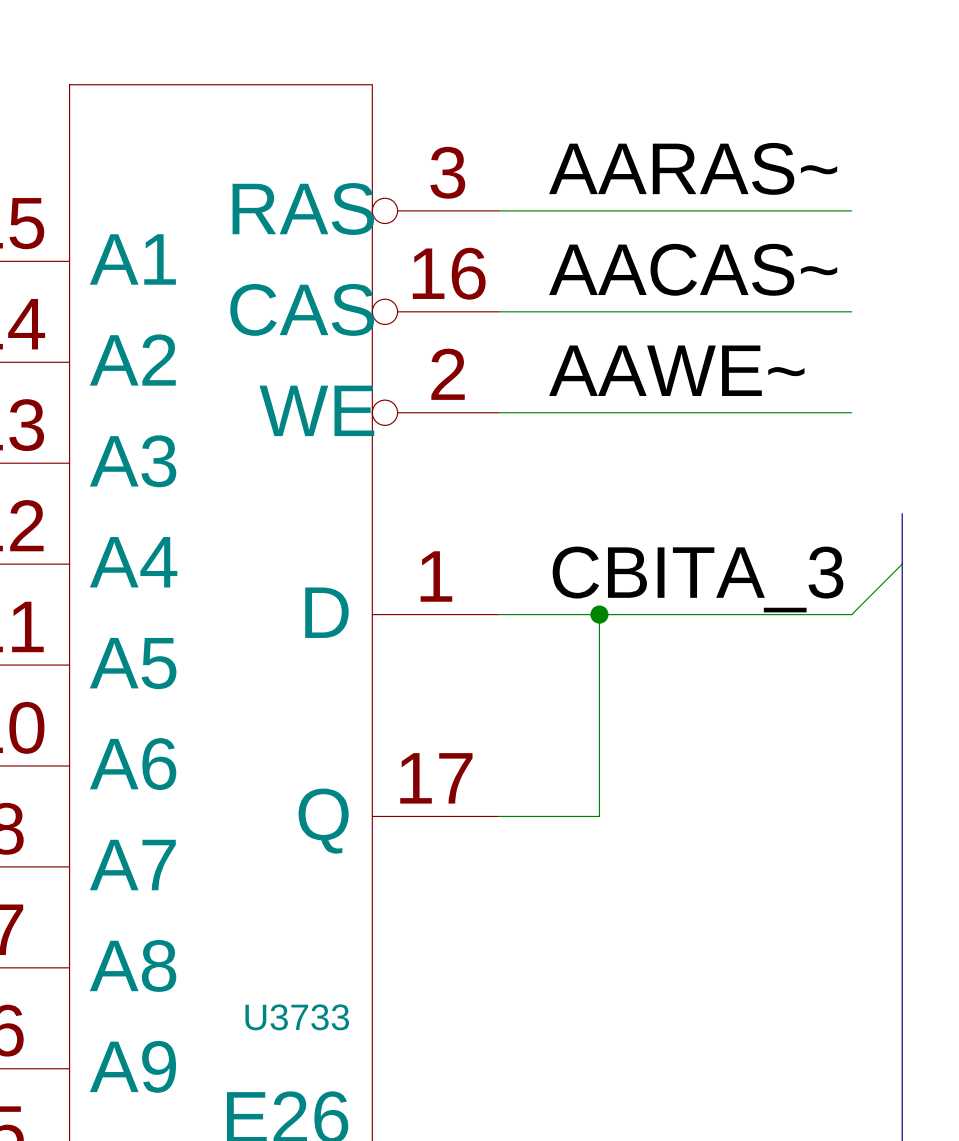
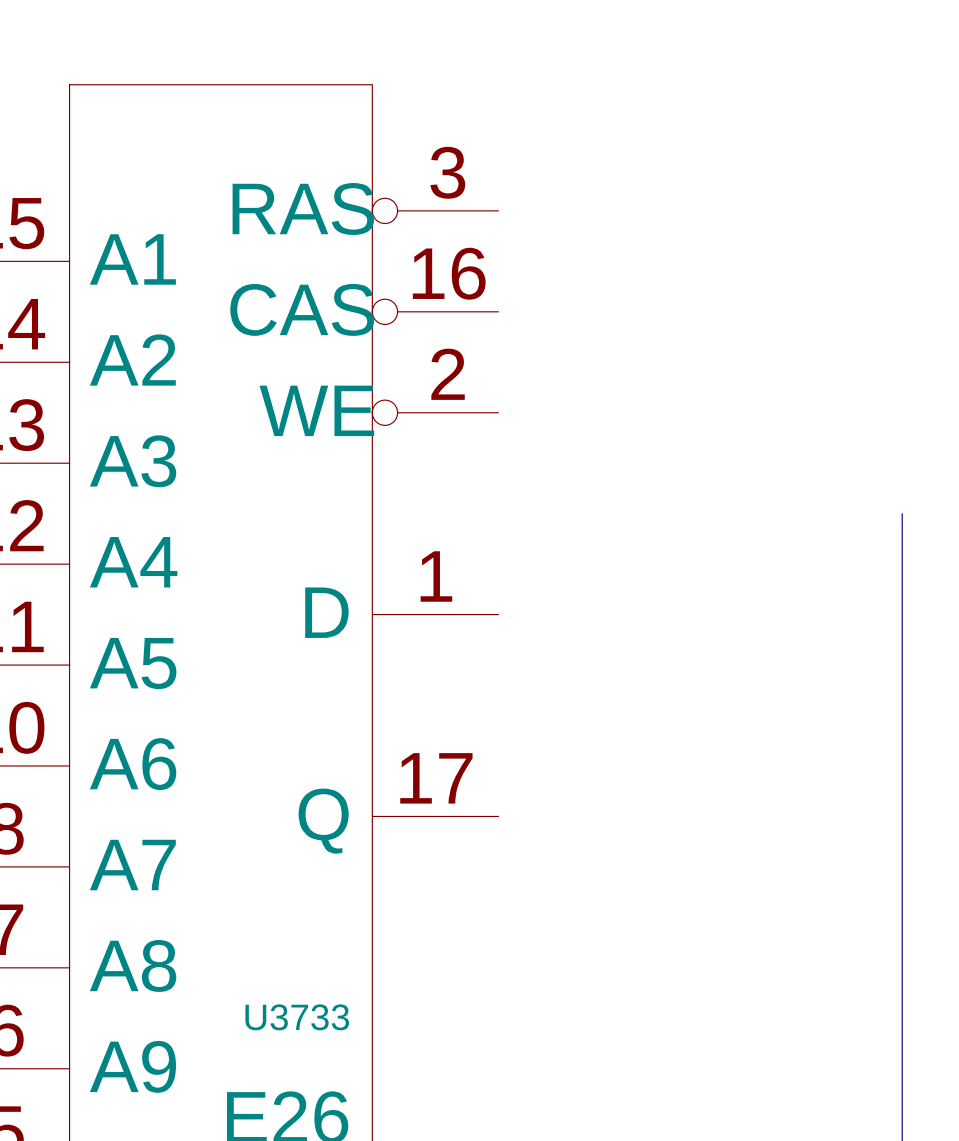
label: AARAS~ (693, 168) -> none
wire: (498, 210) (851, 210) -> none
label: AACAS~ (693, 269) -> none
wire: (498, 311) (851, 311) -> none
label: AAWE~ (676, 370) -> none
wire: (498, 412) (851, 412) -> none
wire: (902, 564) (851, 614) (498, 614) -> none
label: CBITA_3 (698, 579) -> none
wire: (599, 614) (599, 816) (498, 816) -> none
junction: (599, 614) -> none

